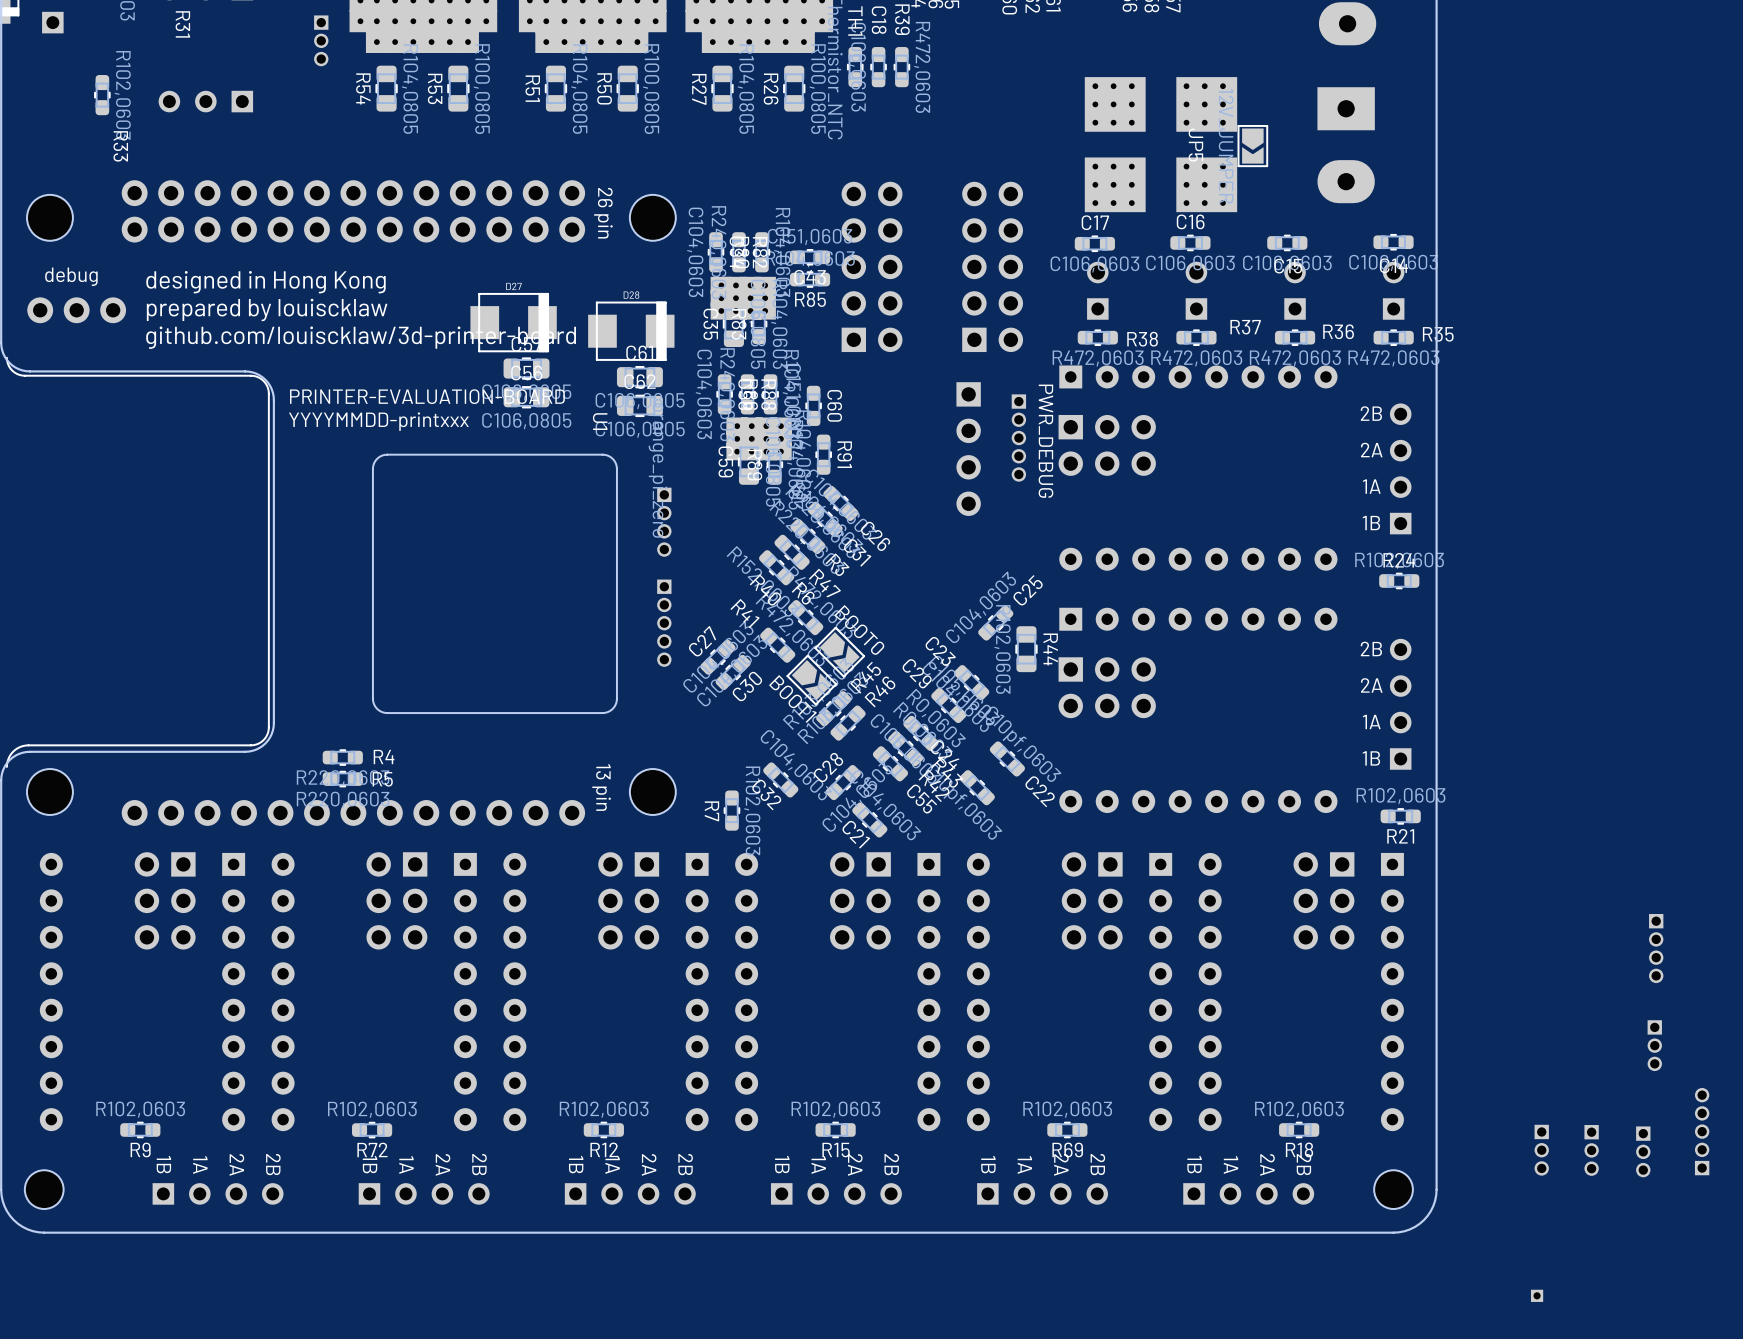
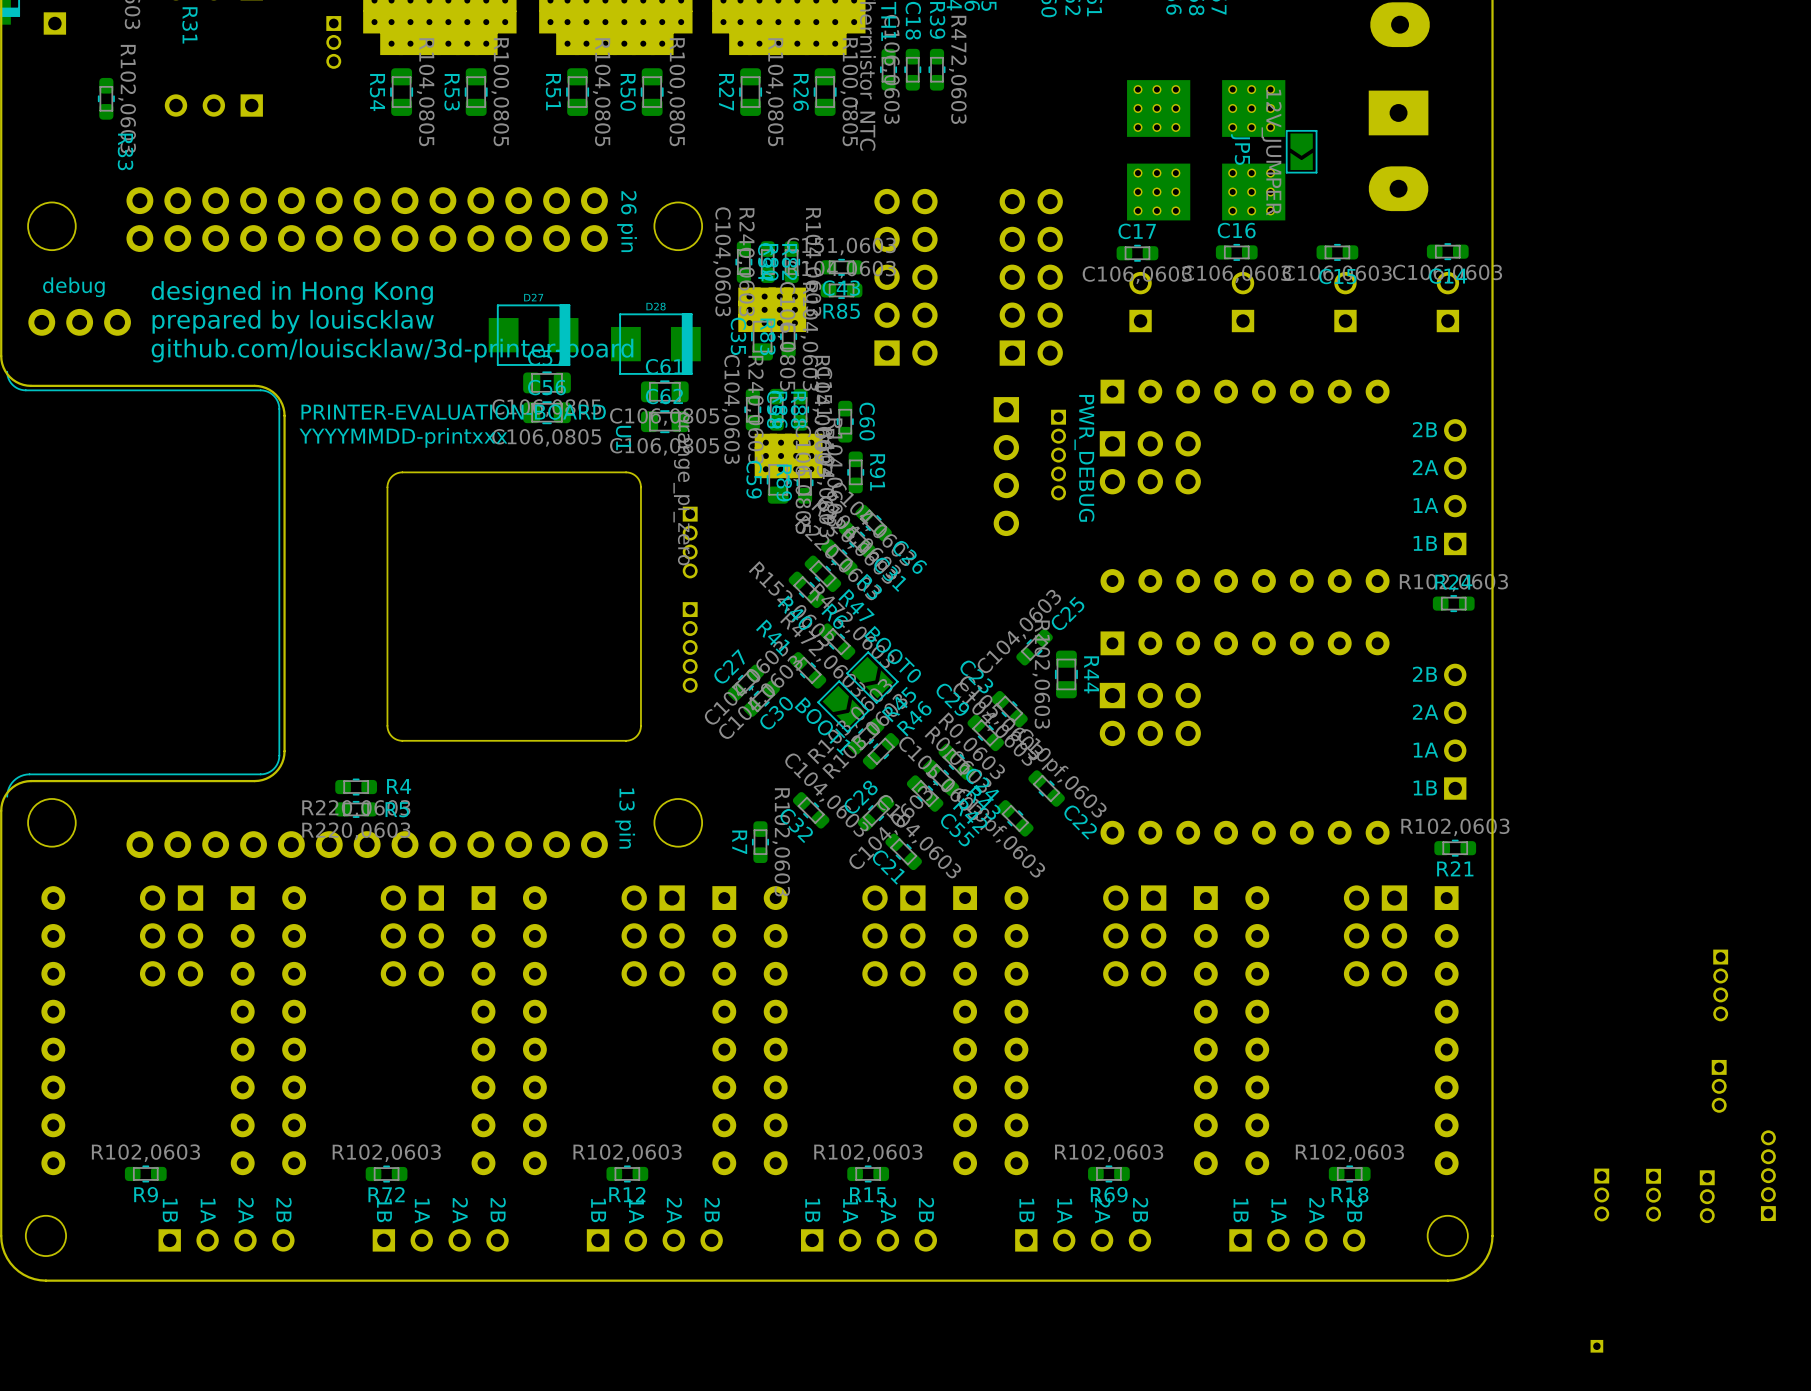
R38: R472,0603 (1097, 337) -> none
R37: R472,0603 (1196, 337) -> none
R36: R472,0603 (1295, 337) -> none
R35: R472,0603 (1393, 337) -> none

